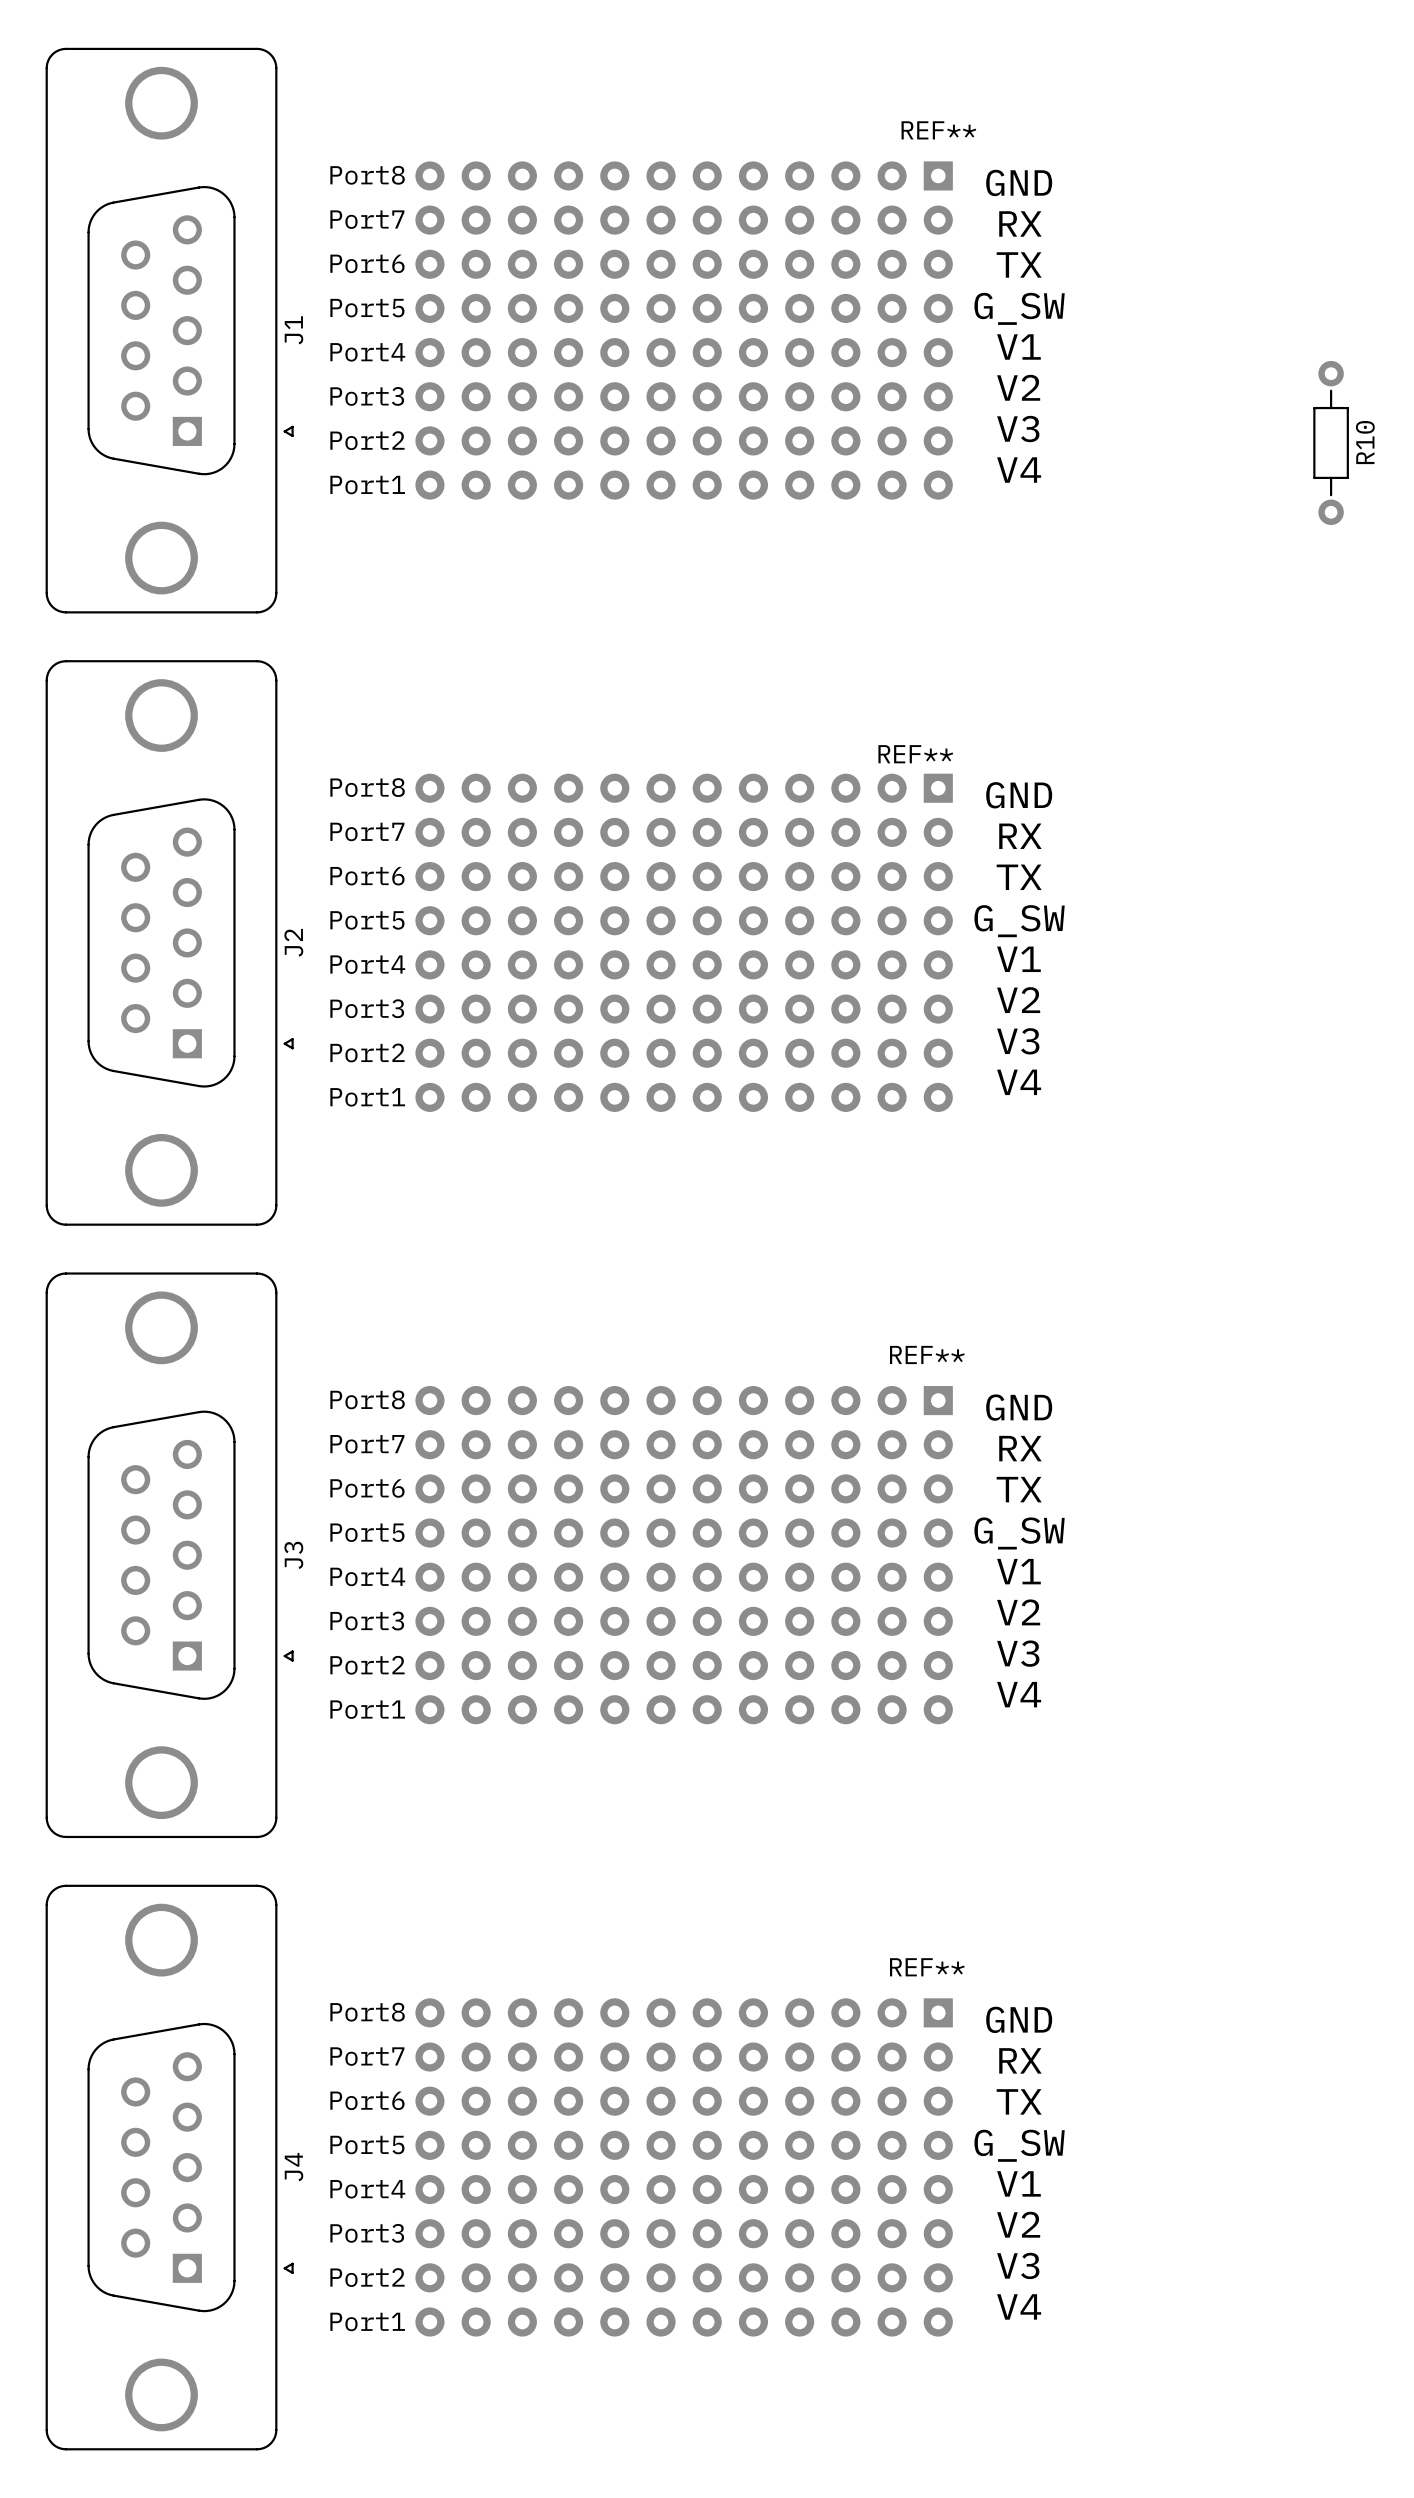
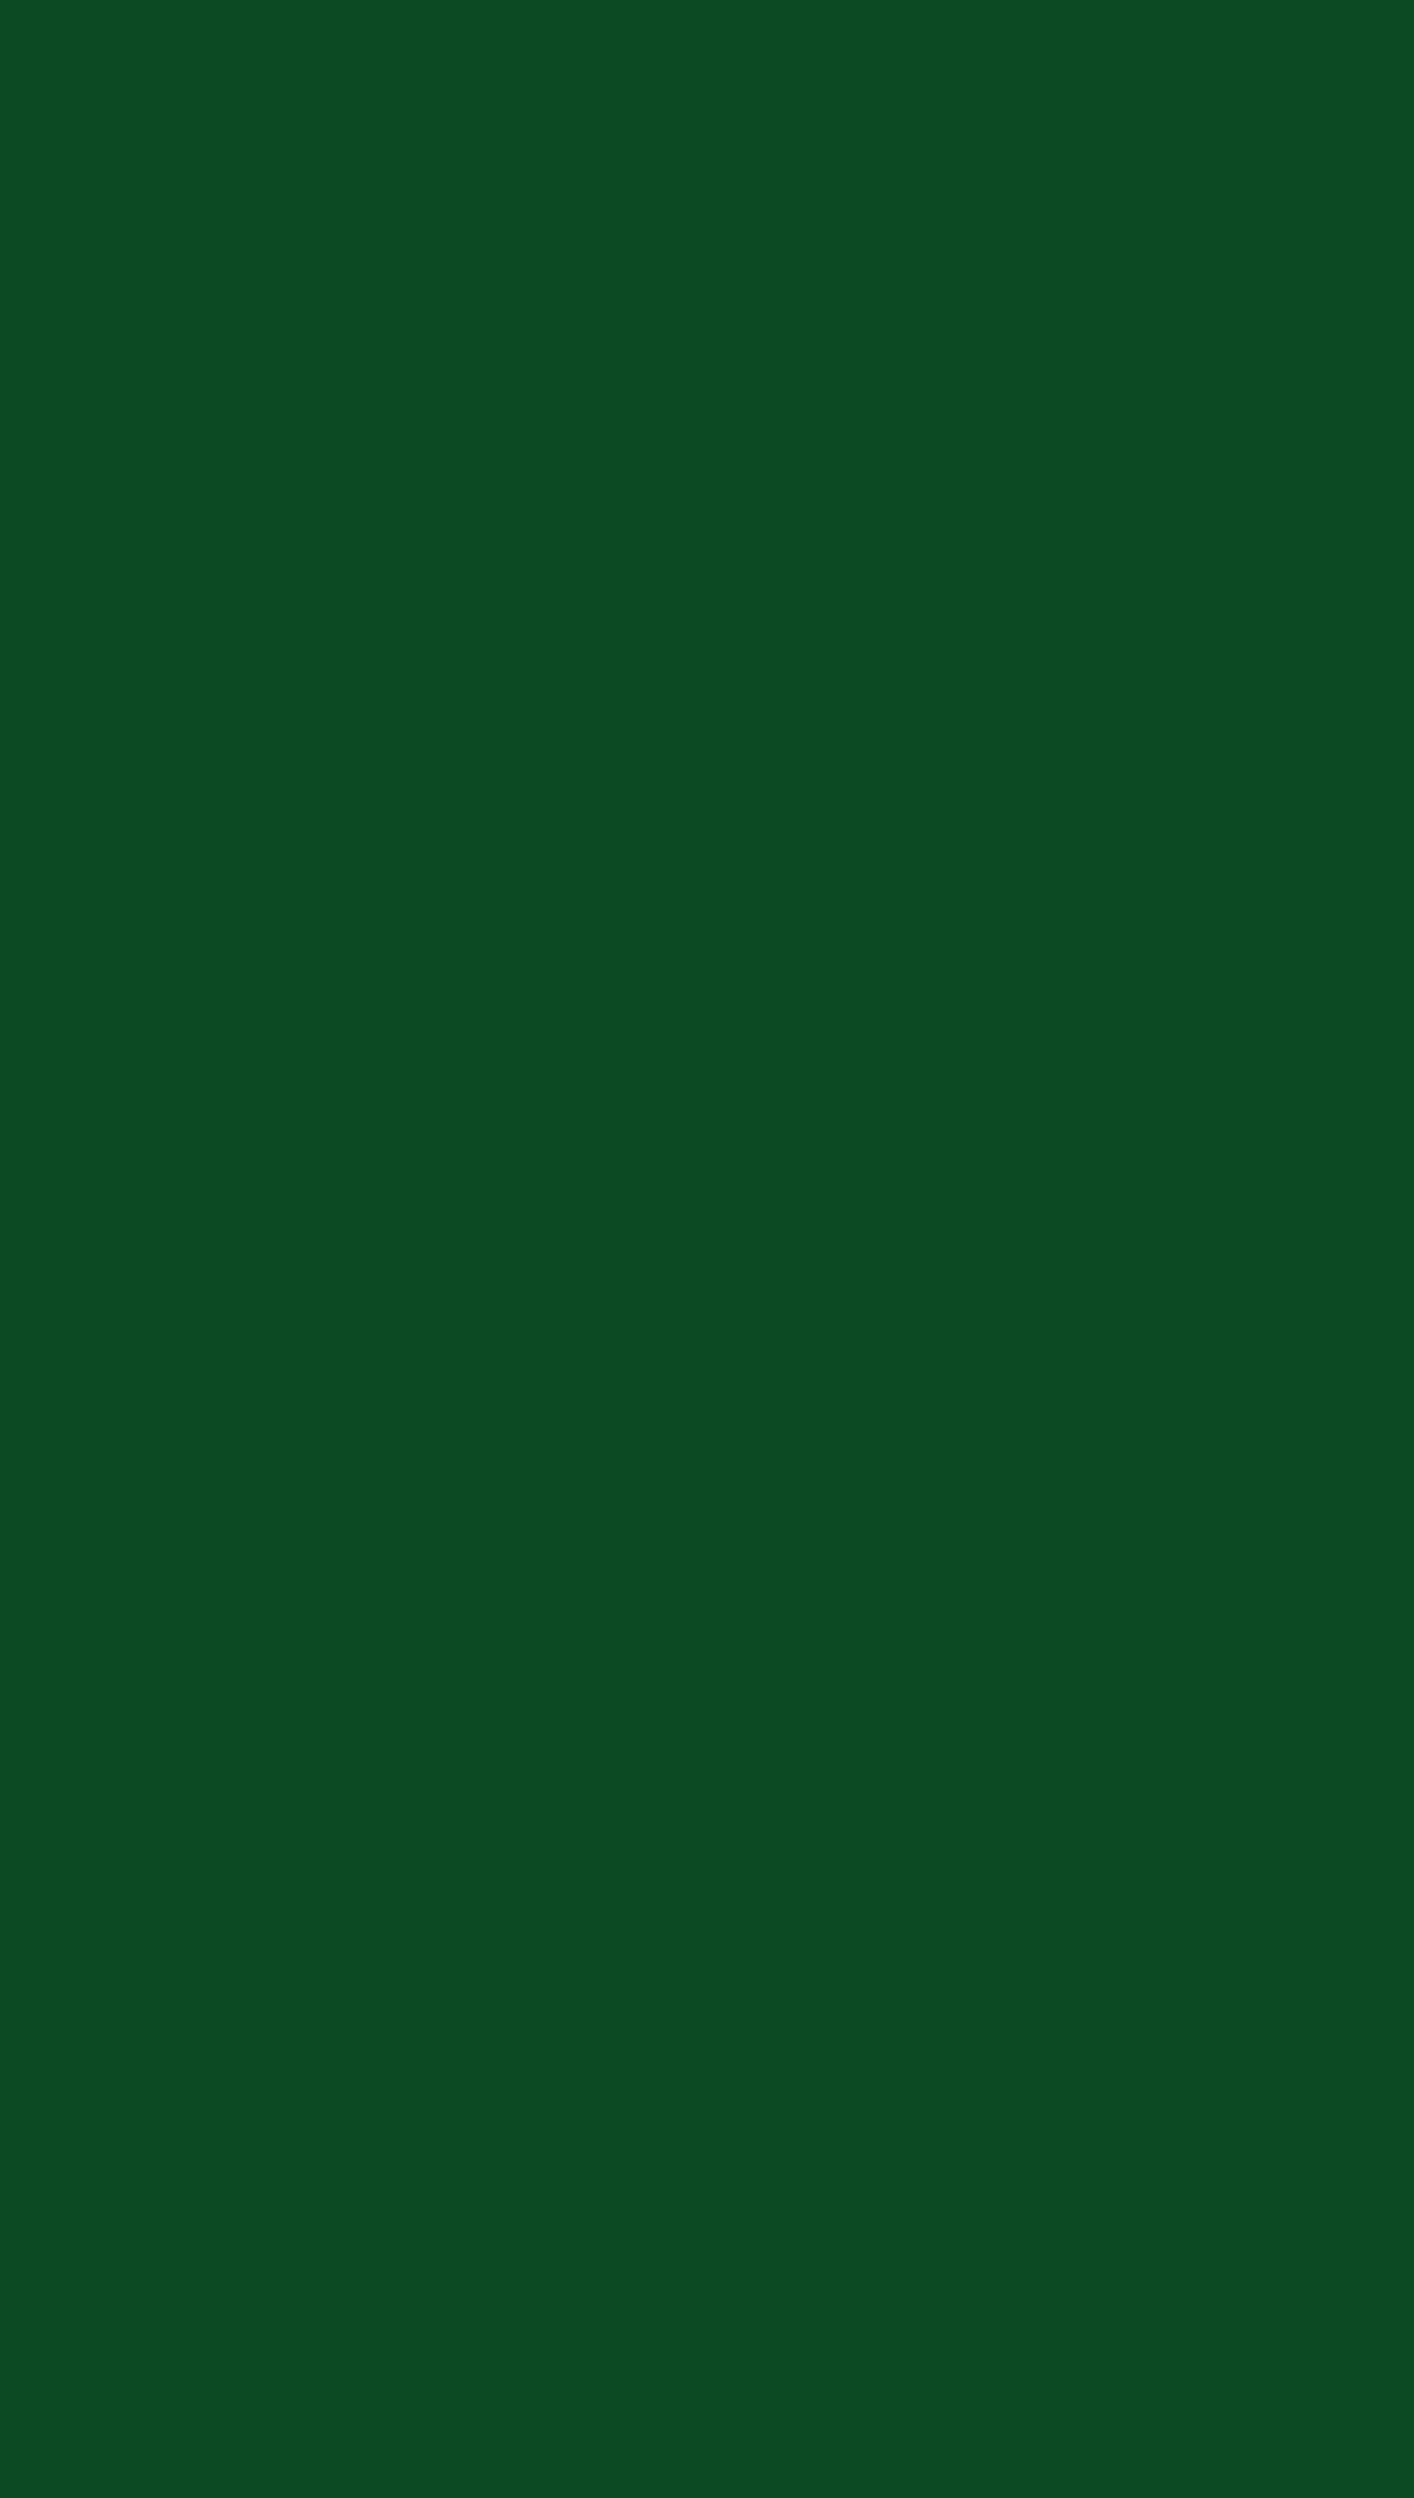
text: GND (1019, 182) -> none
text: RX (1020, 223) -> none
text: TX (1019, 264) -> none
text: G_SW (1019, 308) -> none
J1: (169, 330) -> none
REF**: (684, 330) -> none
text: V1 (1018, 347) -> none
text: V2 (1018, 387) -> none
text: V3 (1018, 429) -> none
R10: (1331, 442) -> none
text: V4 (1019, 470) -> none
text: GND (1019, 795) -> none
text: RX (1020, 836) -> none
text: TX (1019, 877) -> none
text: G_SW (1019, 921) -> none
J2: (169, 942) -> none
REF**: (684, 942) -> none
text: V1 (1018, 959) -> none
text: V2 (1018, 1000) -> none
text: V3 (1018, 1041) -> none
text: V4 (1019, 1082) -> none
text: GND (1019, 1407) -> none
text: RX (1020, 1448) -> none
text: TX (1019, 1489) -> none
text: G_SW (1019, 1533) -> none
J3: (169, 1555) -> none
REF**: (684, 1555) -> none
text: V1 (1018, 1571) -> none
text: V2 (1018, 1612) -> none
text: V3 (1018, 1653) -> none
text: V4 (1019, 1694) -> none
text: GND (1019, 2019) -> none
text: RX (1020, 2060) -> none
text: TX (1019, 2101) -> none
text: G_SW (1019, 2145) -> none
J4: (169, 2167) -> none
REF**: (684, 2167) -> none
text: V1 (1018, 2183) -> none
text: V2 (1018, 2224) -> none
text: V3 (1018, 2265) -> none
text: V4 (1019, 2306) -> none

